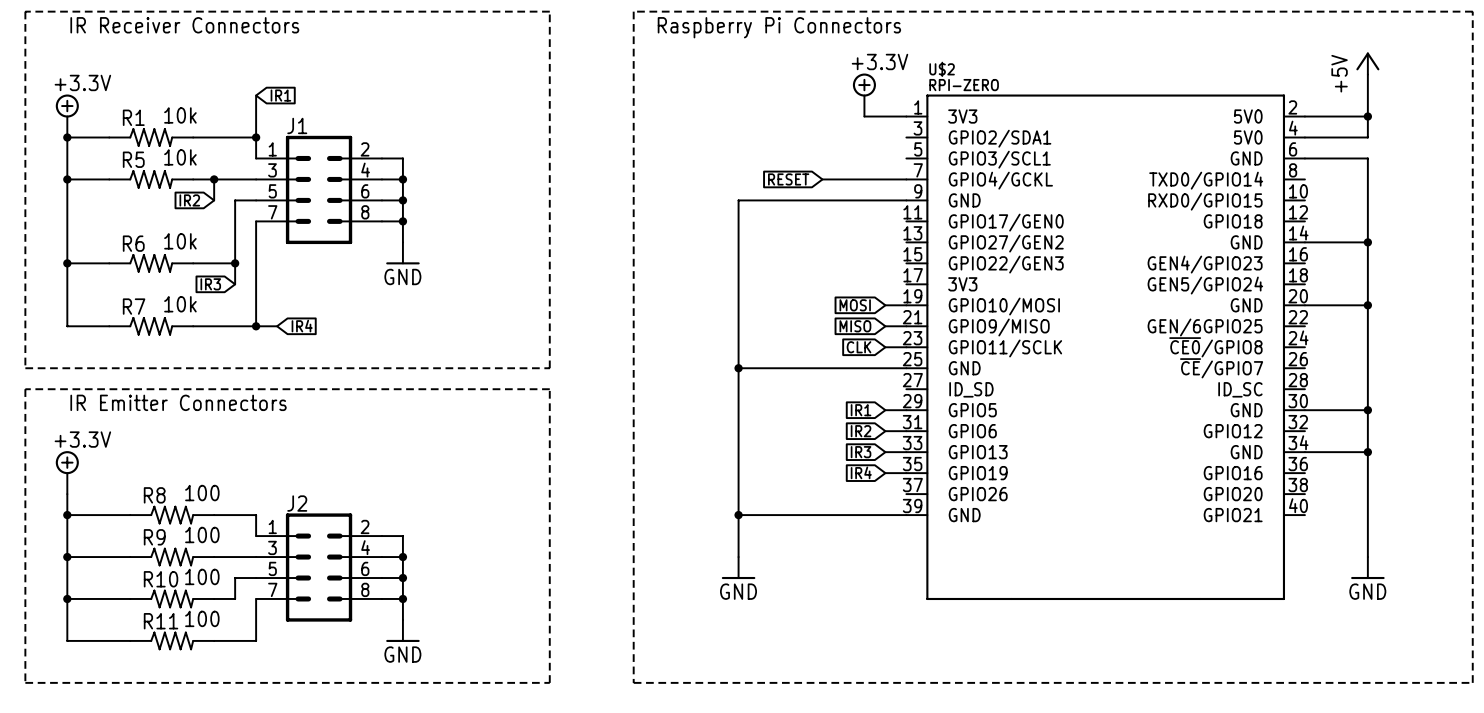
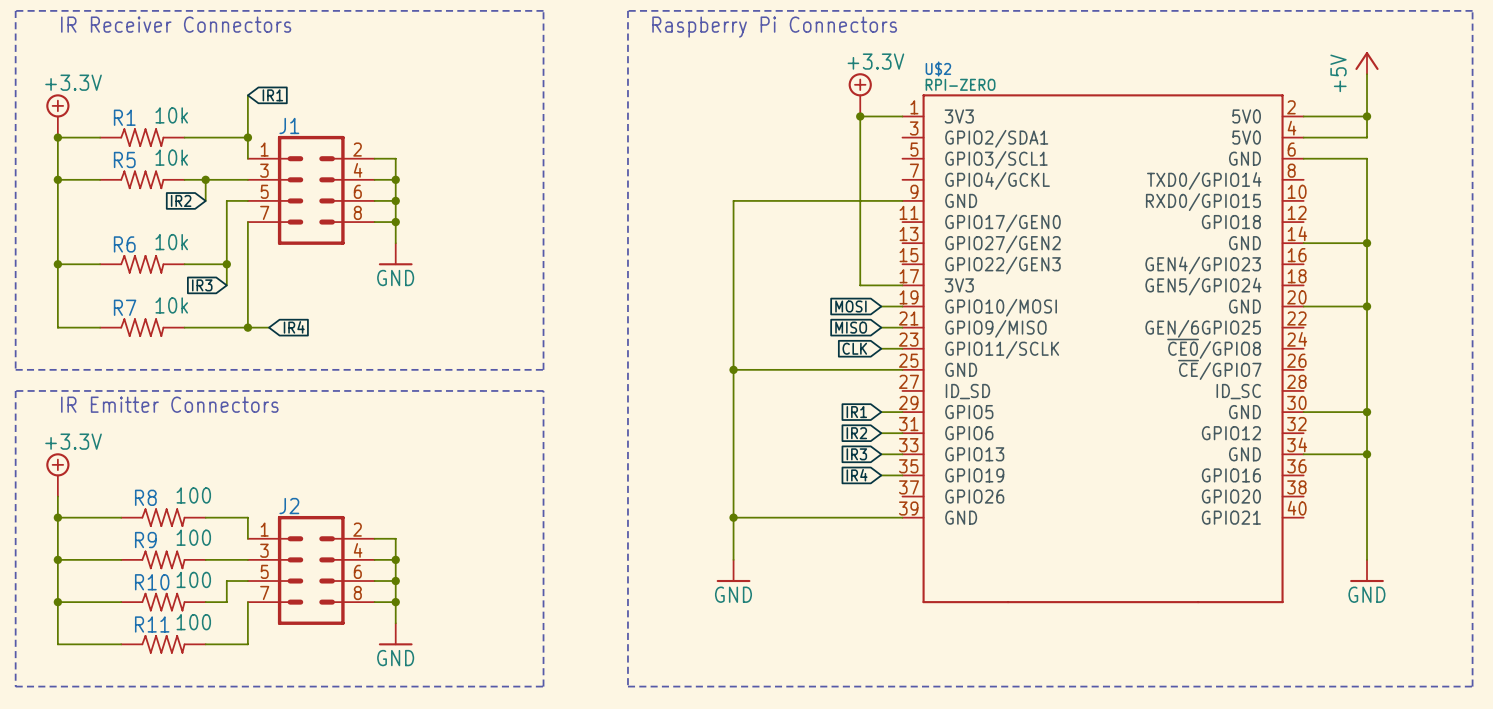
wire: none -> (860, 116) (860, 285) (902, 285)
junction: none -> (860, 116)
global label: RESET (788, 179) -> none
wire: (822, 179) (906, 179) -> none

